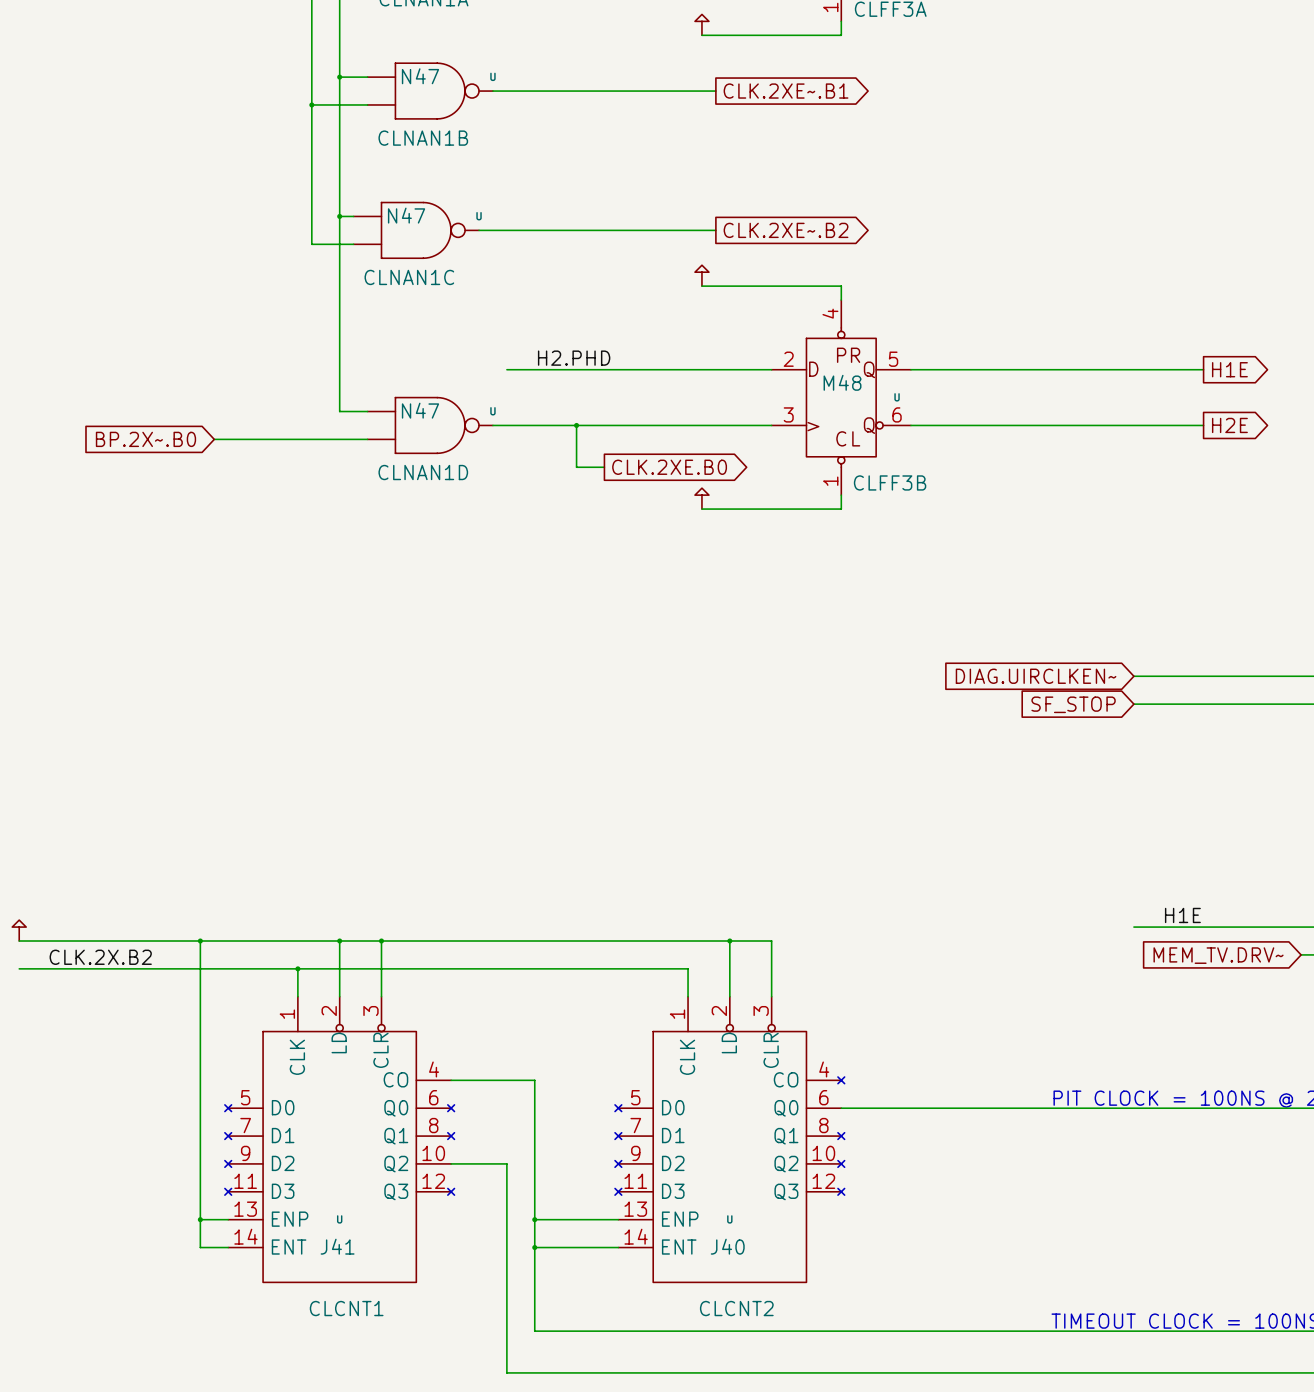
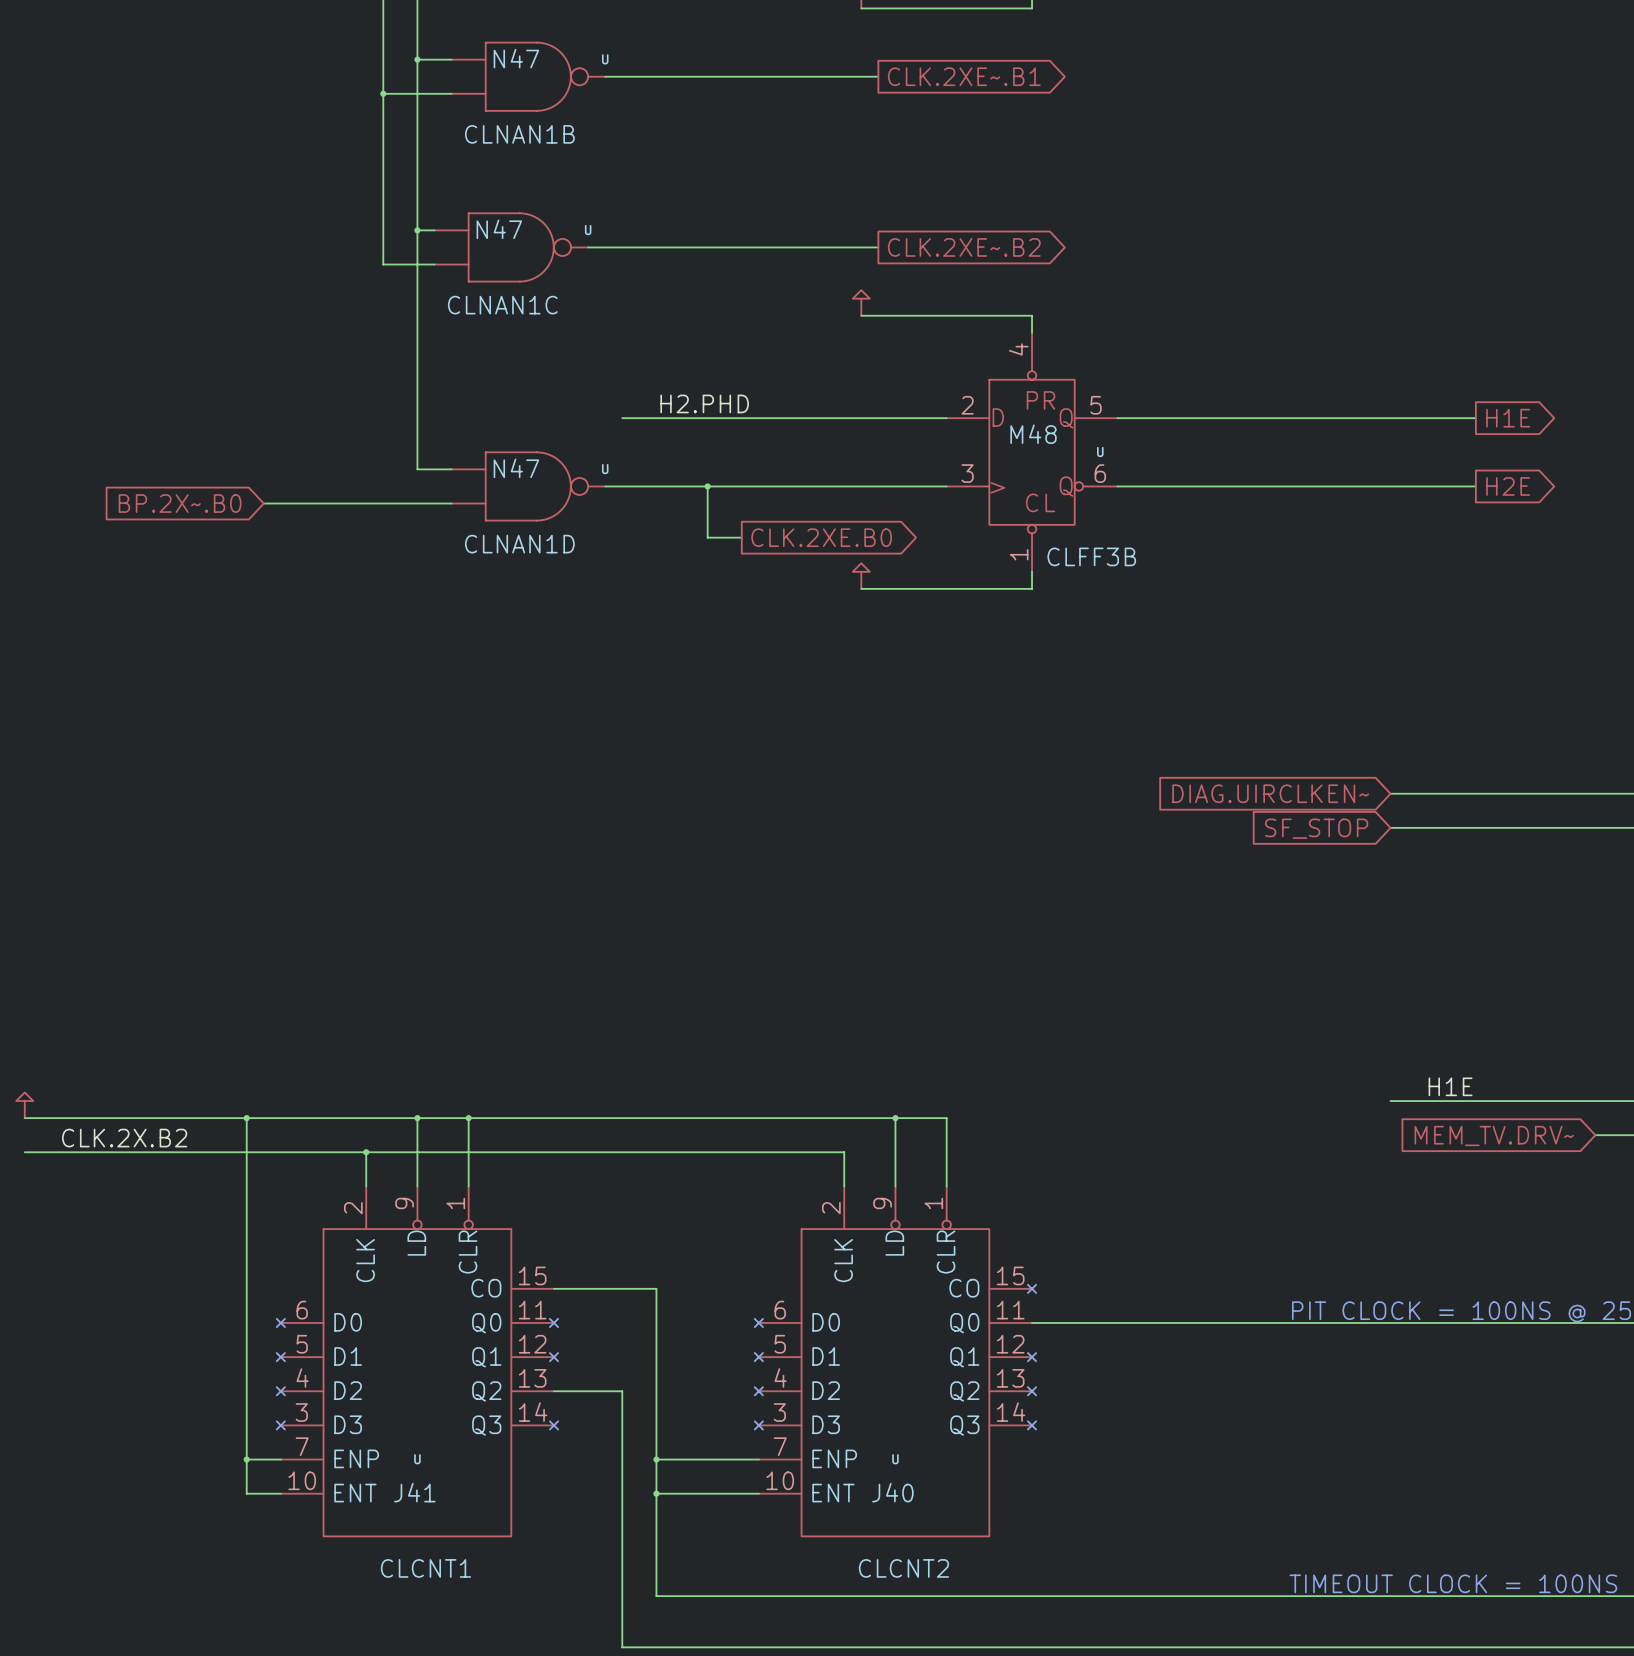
U symbol: [228, 996, 452, 1283] -> [280, 1186, 555, 1537]
U symbol: [618, 996, 842, 1283] -> [758, 1186, 1033, 1537]

